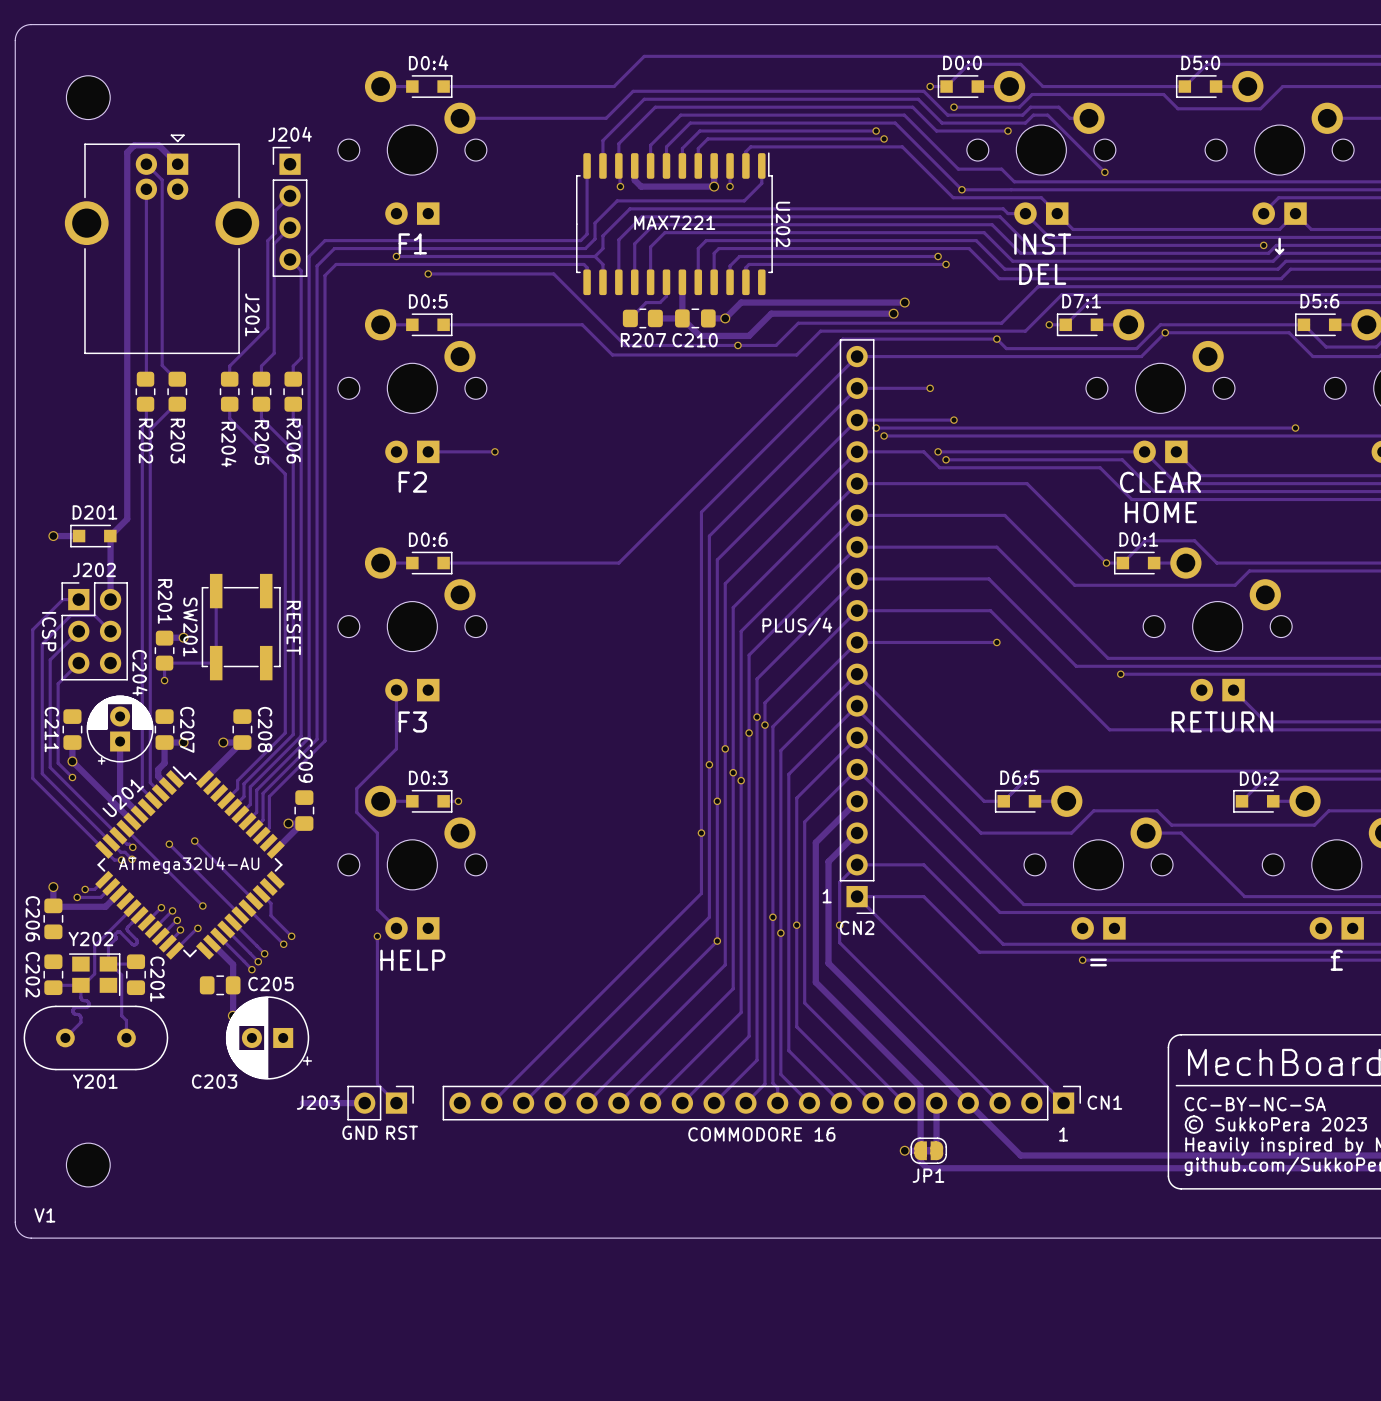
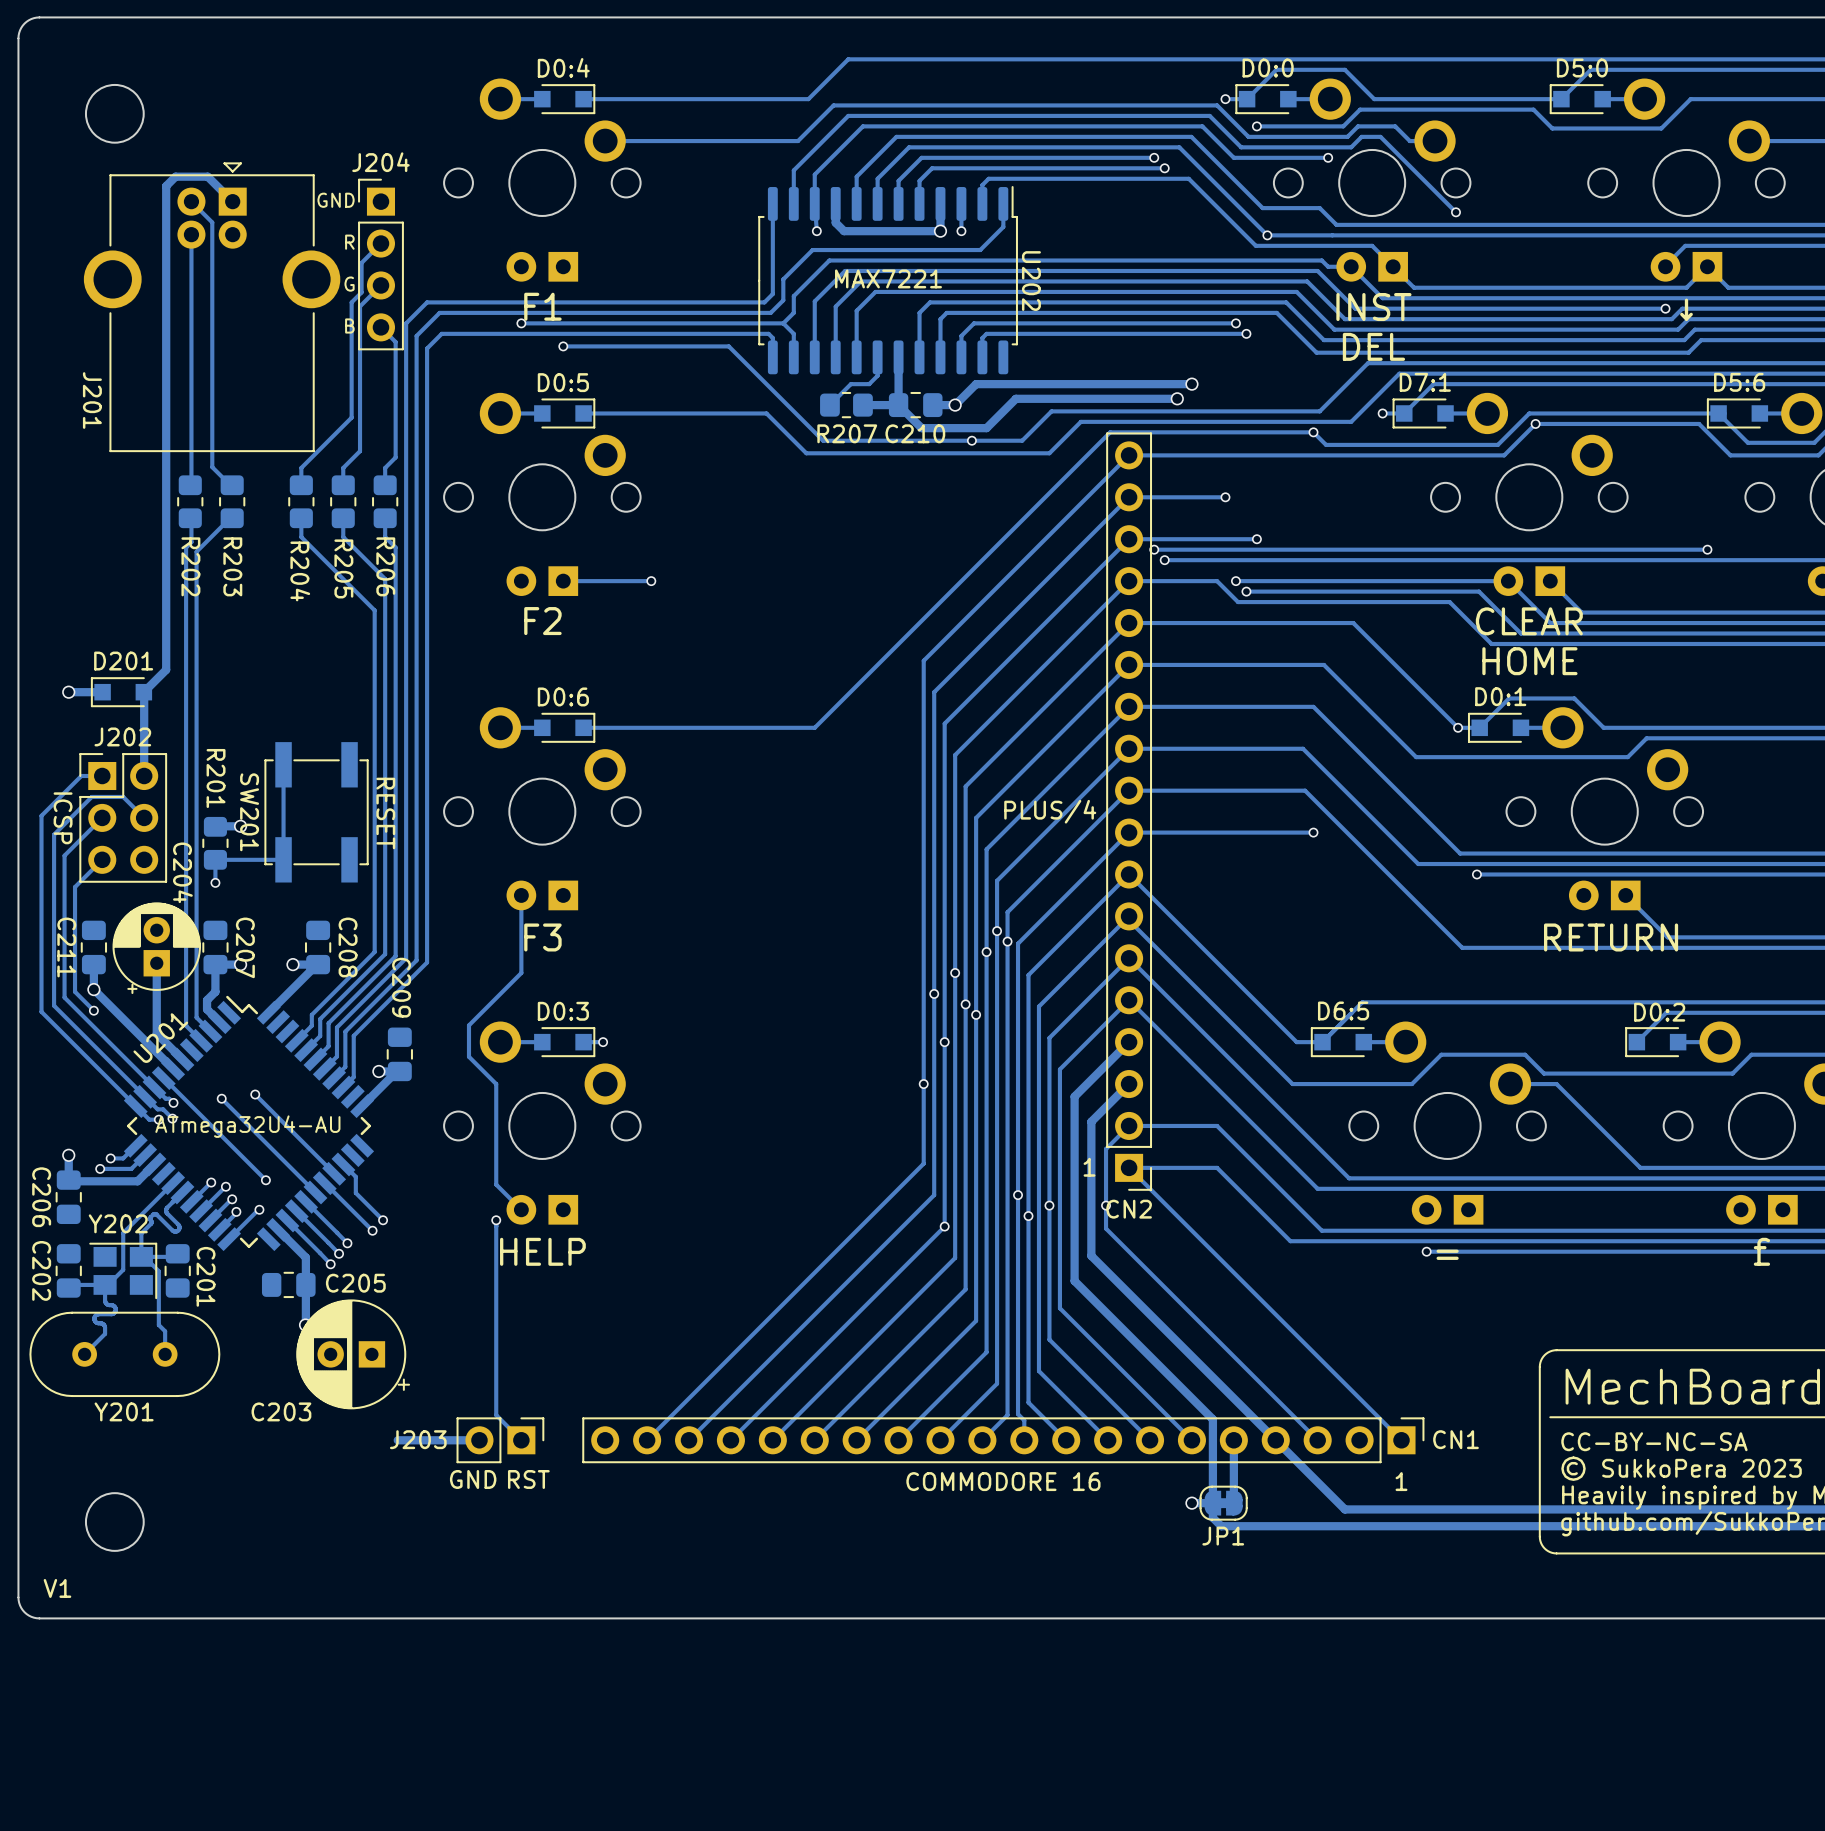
text: none -> GND (336, 200)
text: none -> R (349, 242)
text: none -> G (349, 284)
text: none -> B (349, 325)
J201 name position: J201 (252, 314) -> J201 (92, 400)

